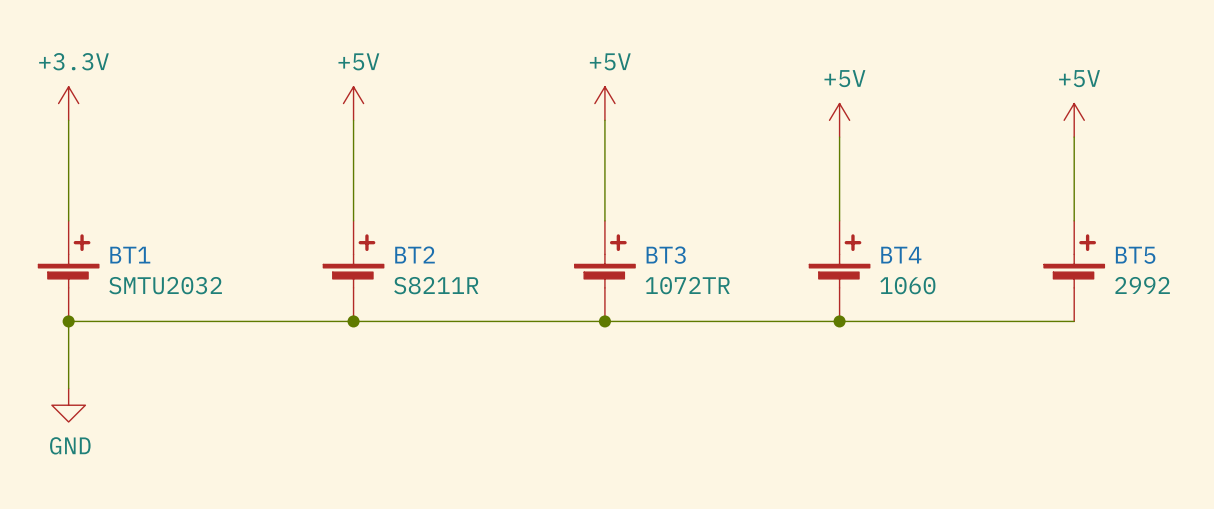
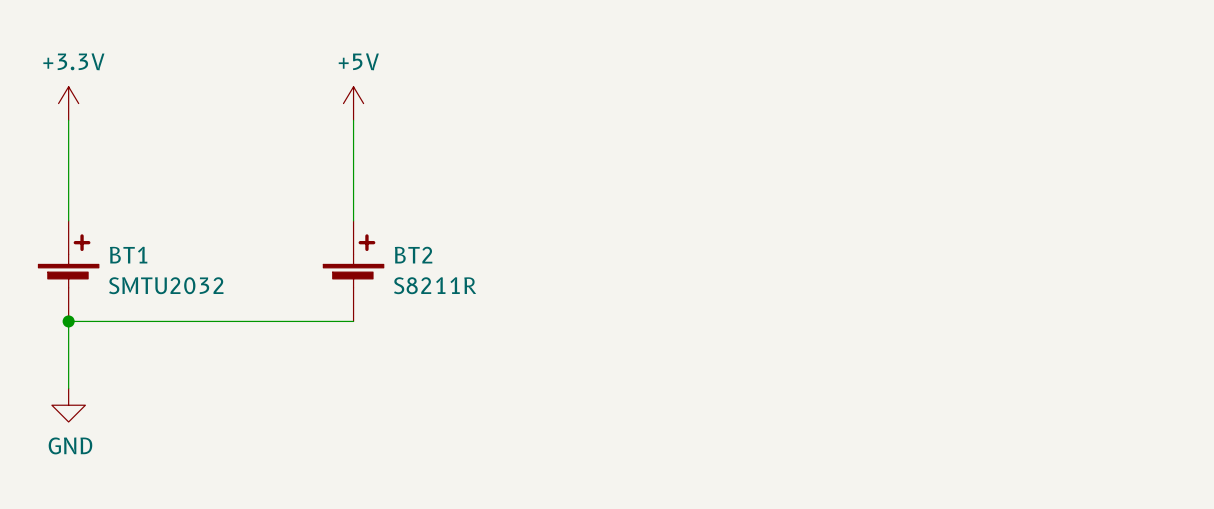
power symbol: +5V (604, 103) -> none
wire: (604, 120) (604, 220) -> none
power symbol: +5V (839, 120) -> none
power symbol: +5V (1074, 120) -> none
wire: (839, 137) (839, 220) -> none
wire: (1074, 137) (1074, 220) -> none
BT3: 1072TR (604, 271) -> none
BT4: 1060 (839, 271) -> none
BT5: 2992 (1074, 271) -> none
wire: (353, 321) (1074, 321) -> none
junction: (353, 321) -> none
junction: (604, 321) -> none
junction: (839, 321) -> none

